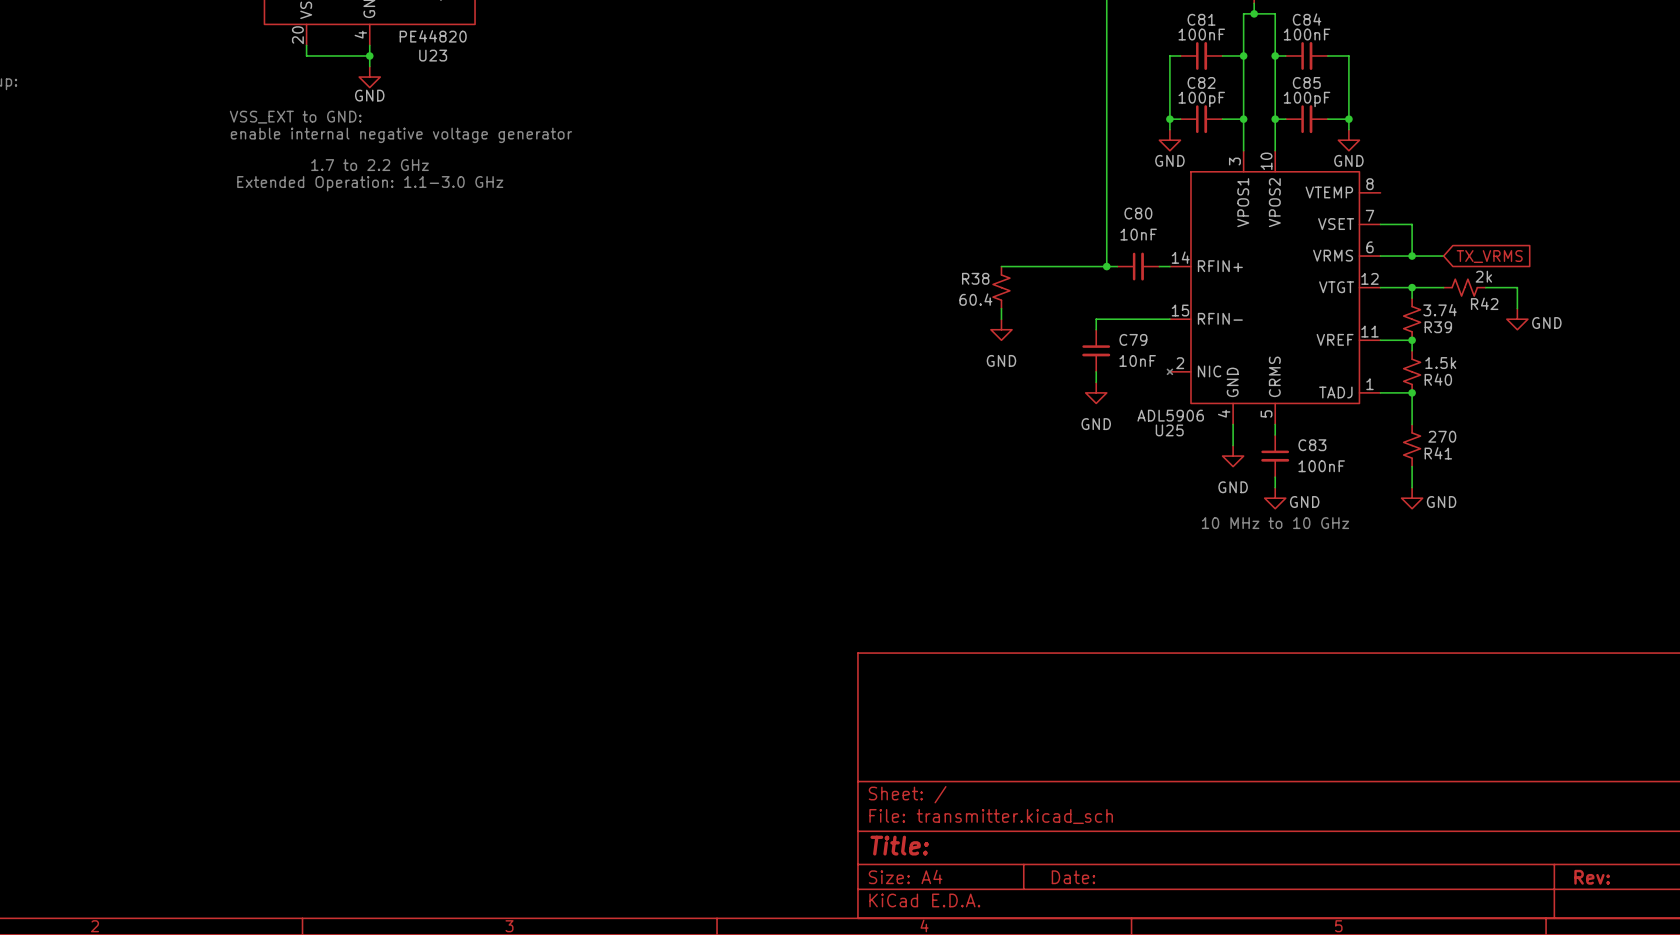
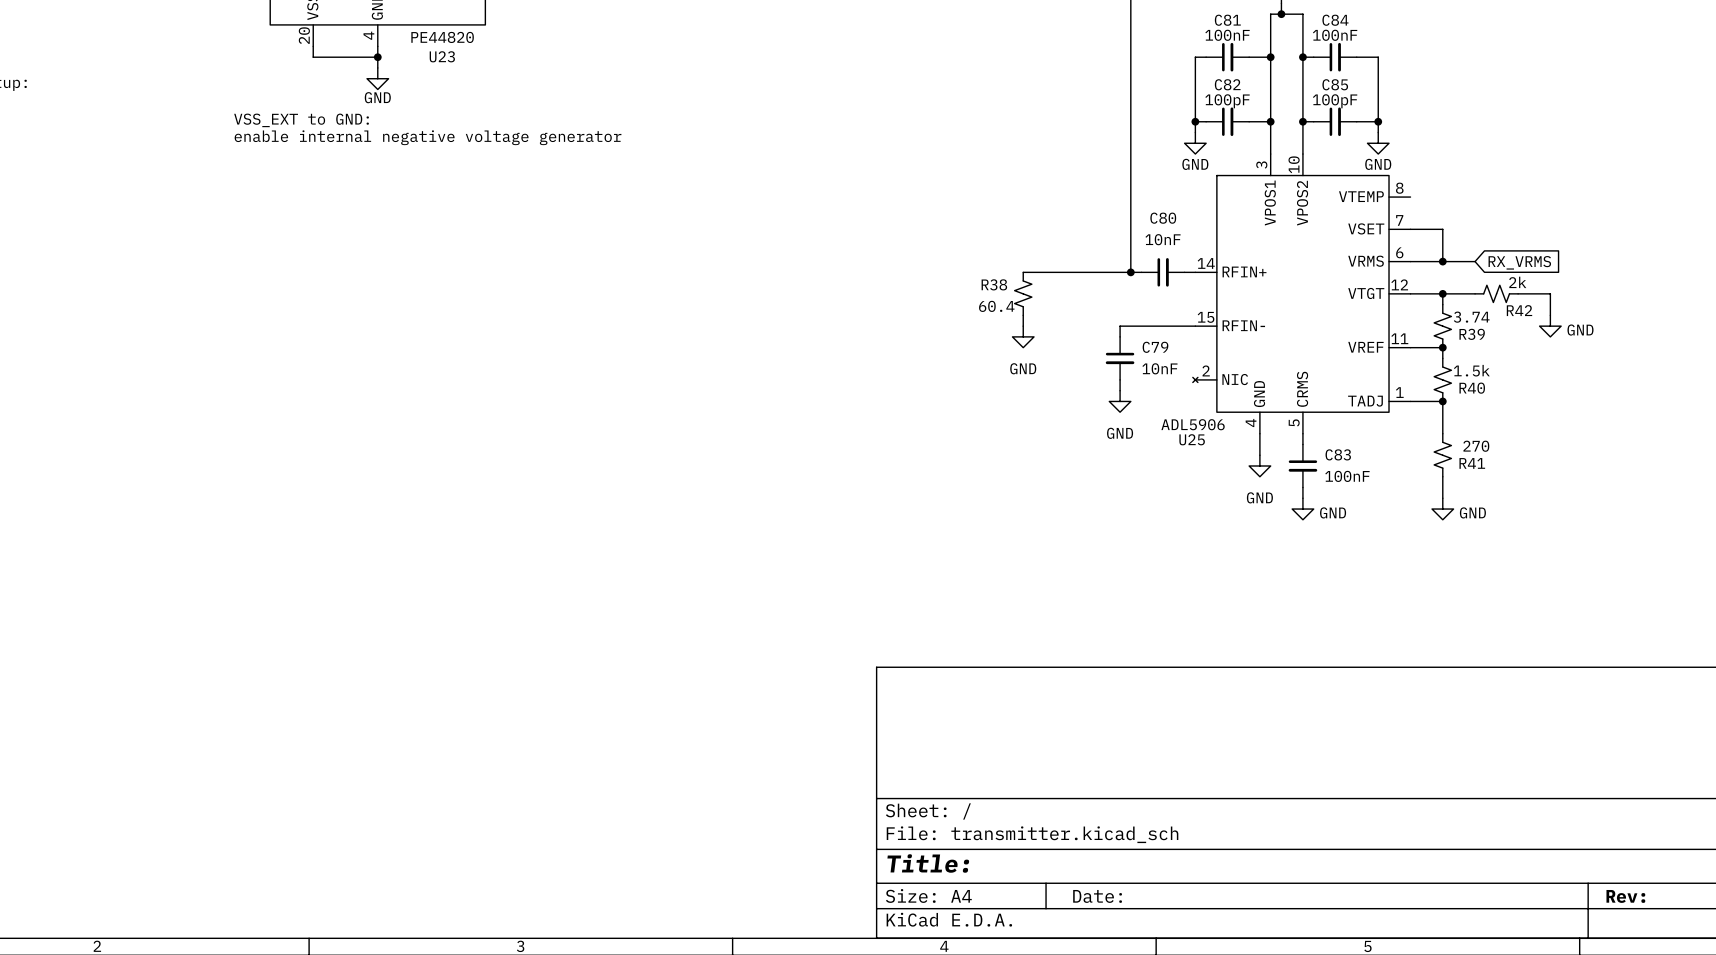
text: 1.7 to 2.2 GHz (370, 165) -> none
text: Extended Operation: 1.1-3.0 GHz (370, 183) -> none
global label: TX_VRMS (1489, 256) -> RX_VRMS (1519, 262)
text: 10 MHz to 10 GHz (1275, 523) -> none

